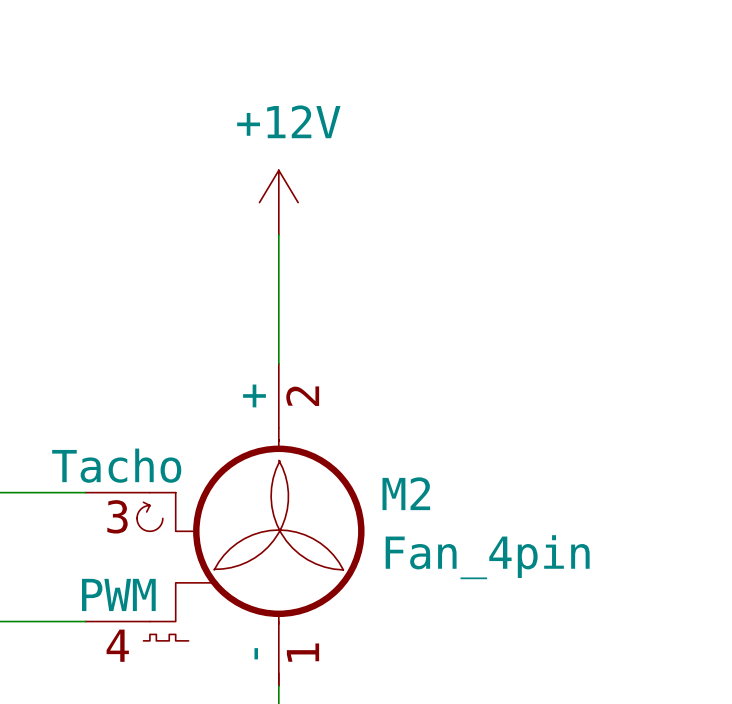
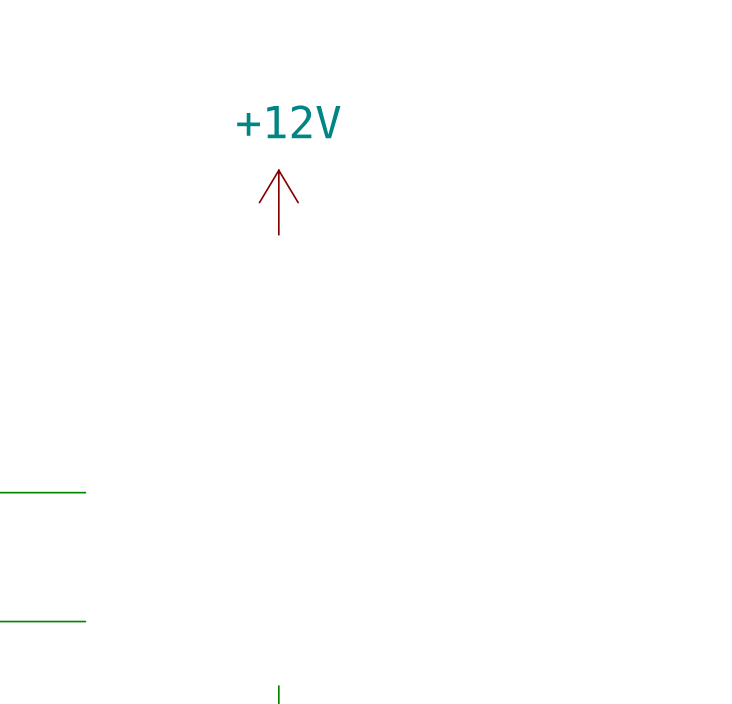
wire: (278, 234) (278, 363) -> none
M2: Fan_4pin (225, 524) -> none

